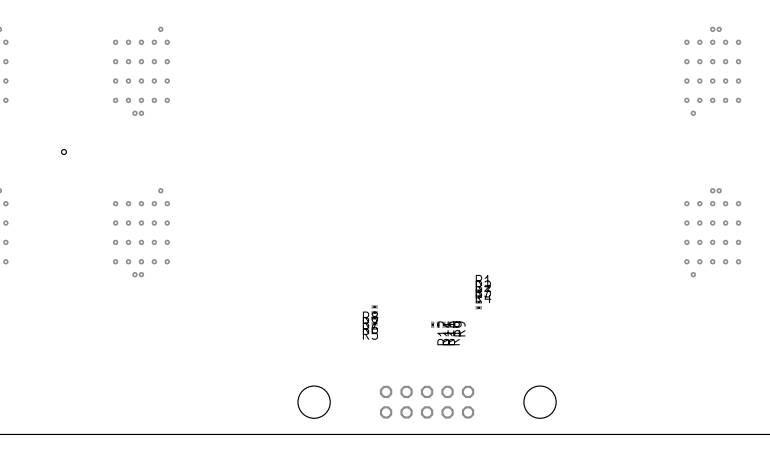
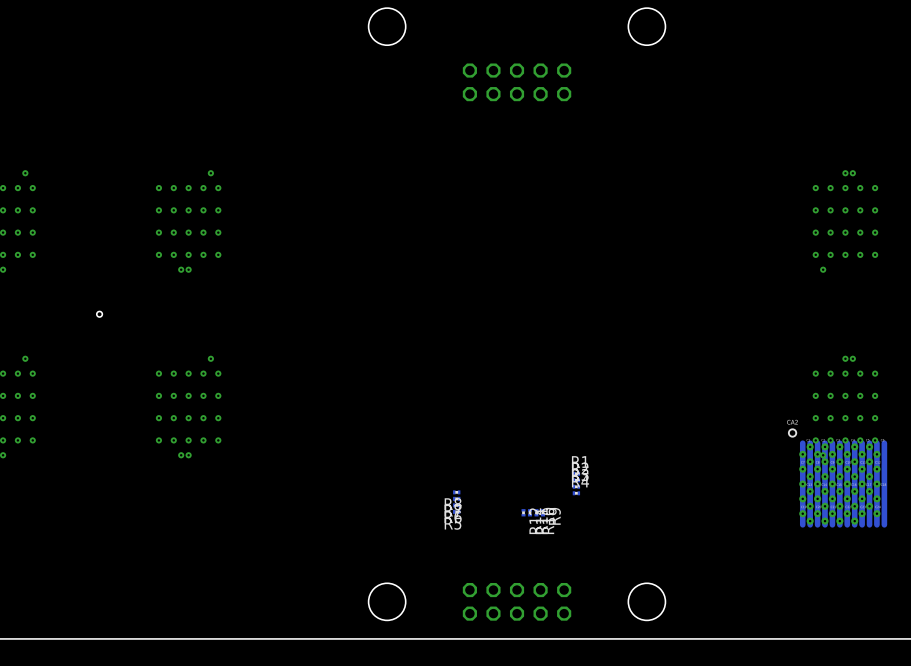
part: none -> (837, 477)

